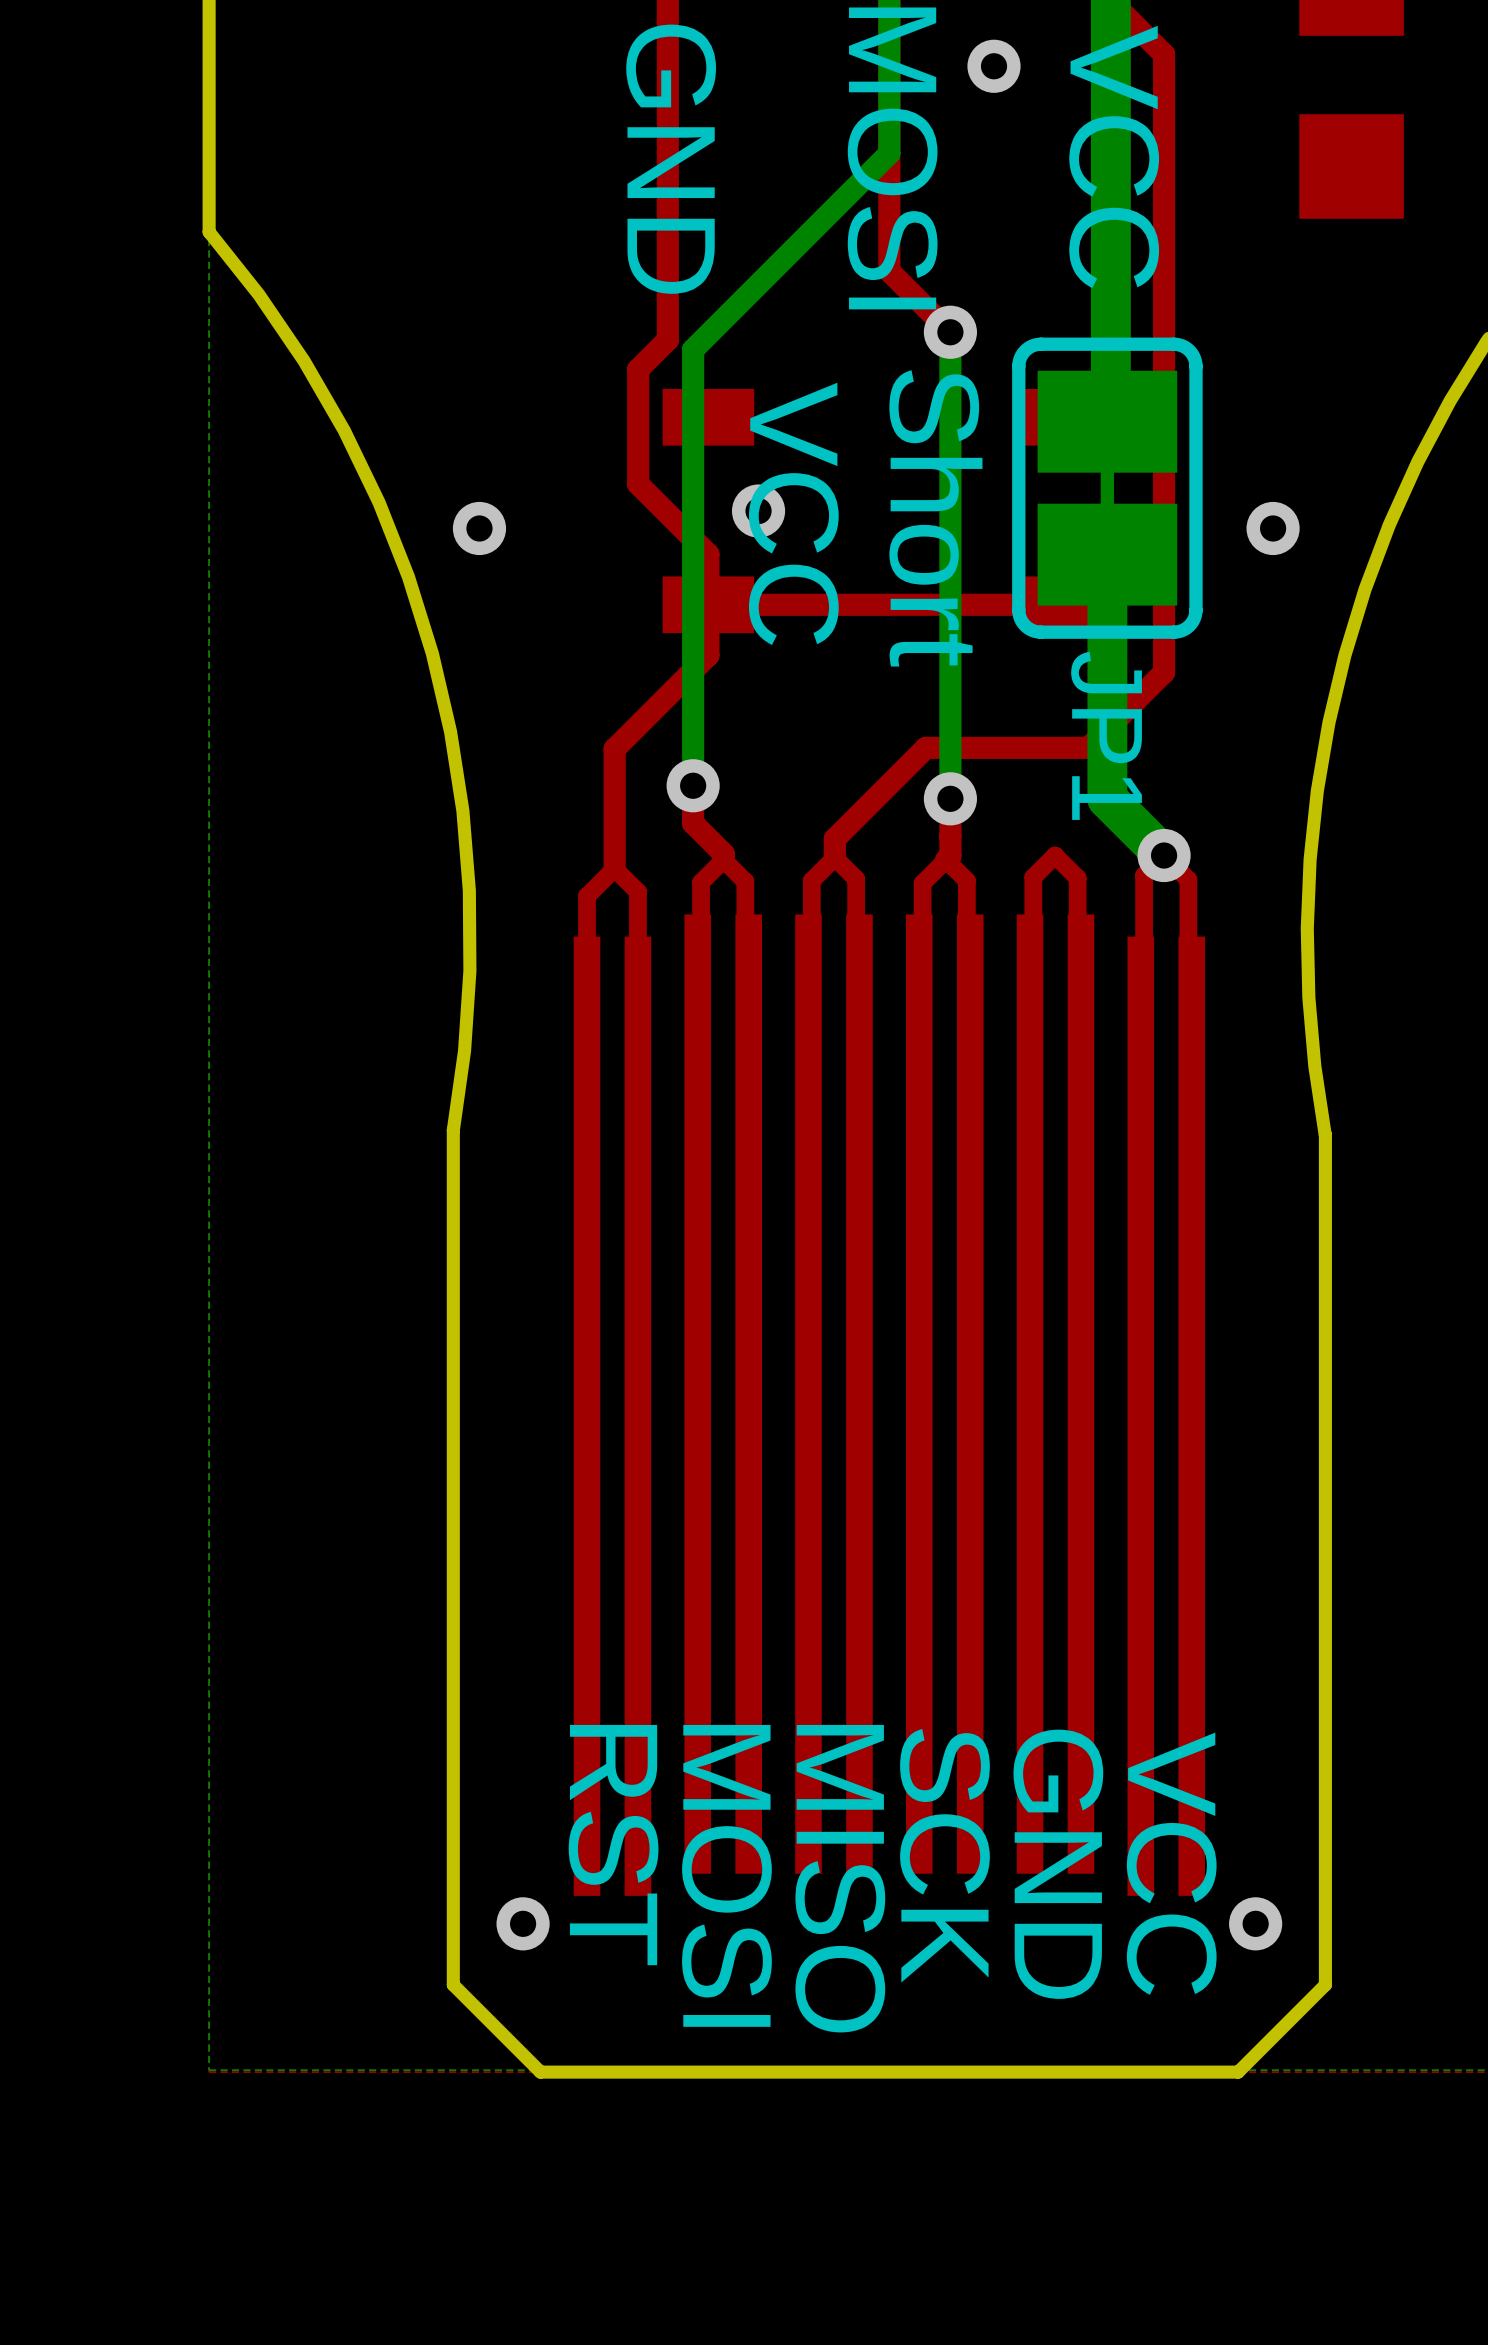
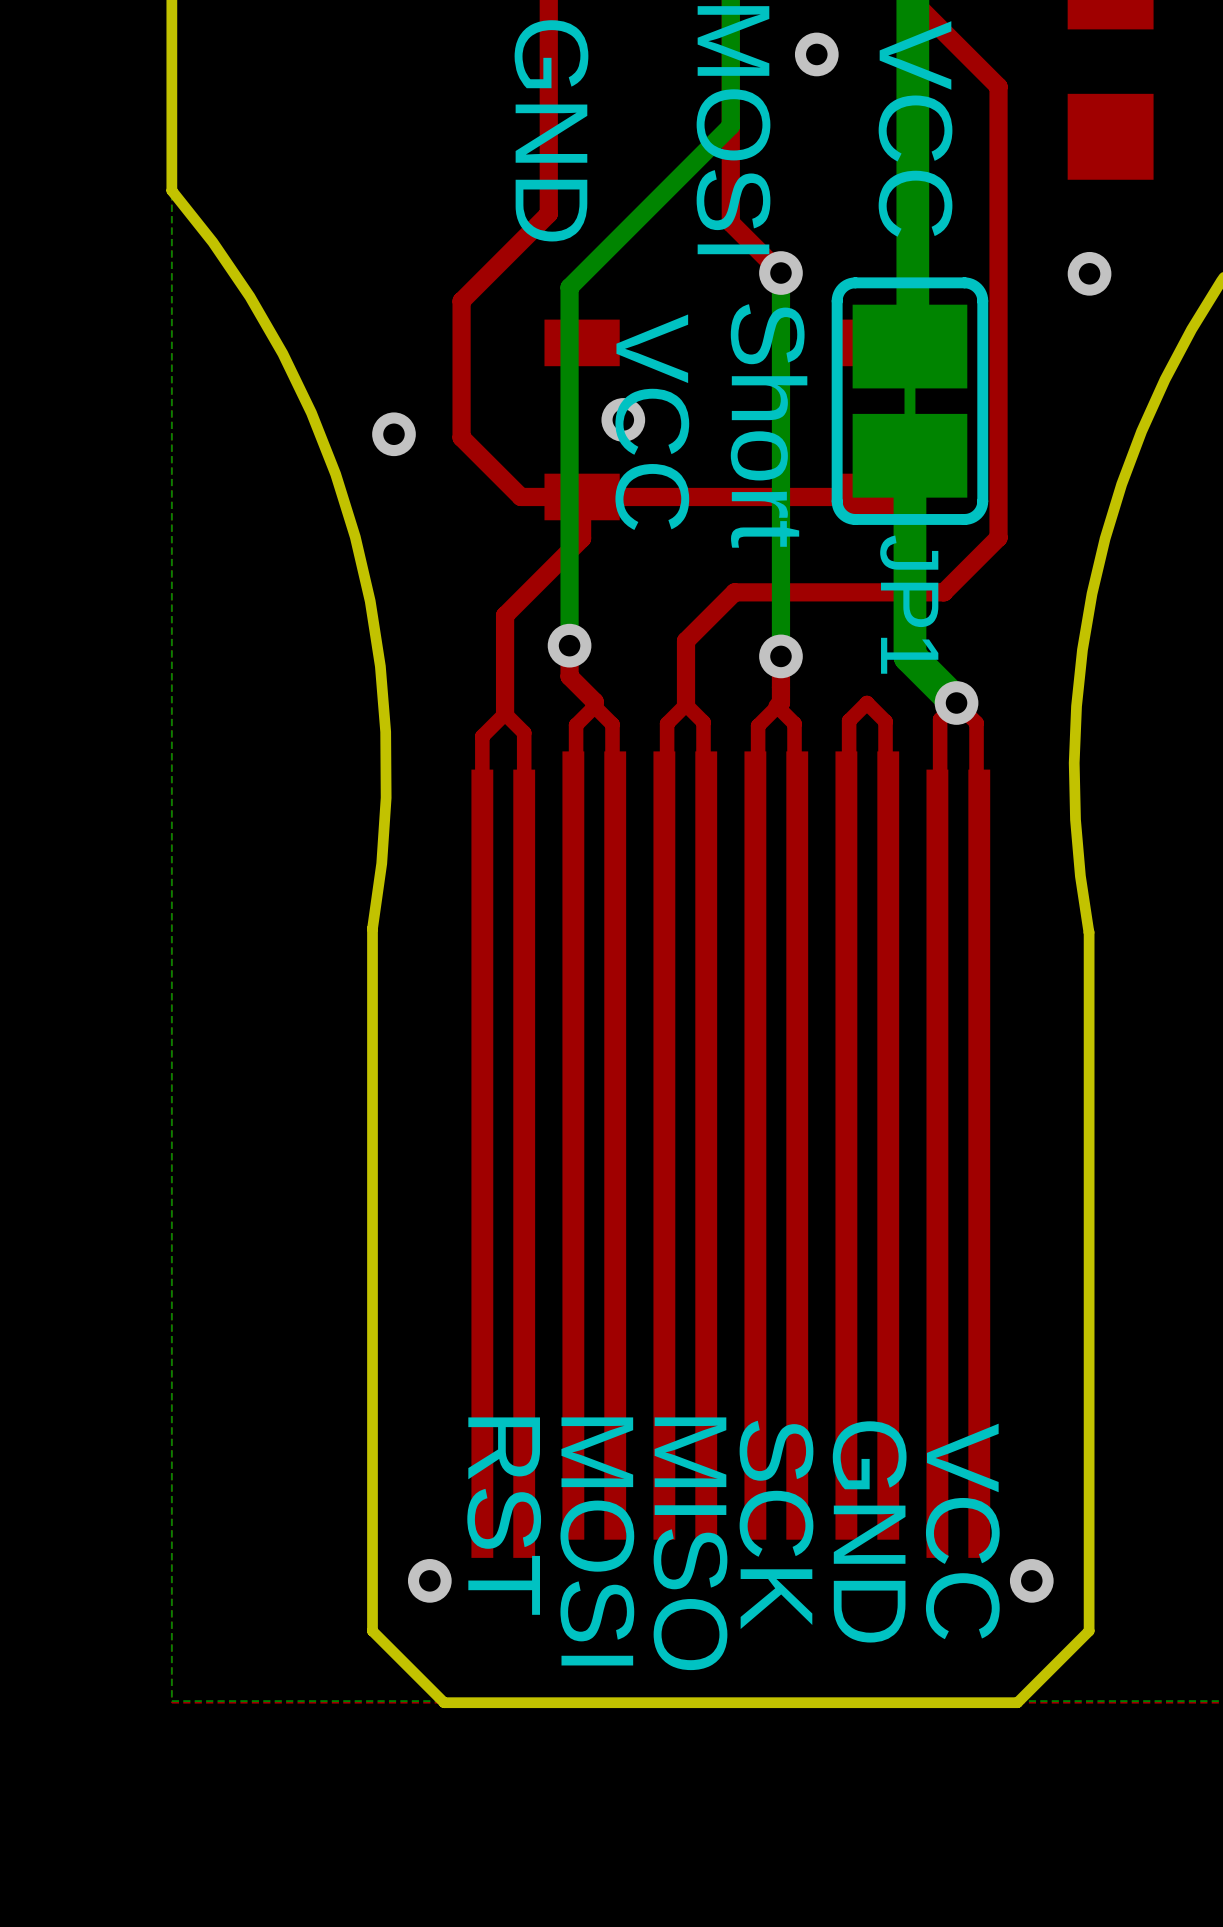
top track: (1164, 54) (1164, 672) (1088, 747) (925, 747) (834, 838) -> (956, 44) (998, 86) (998, 537) (943, 592) (734, 592) (686, 640) (686, 689)
top track: (667, 260) (667, 339) (638, 369) (638, 484) (708, 554) (708, 604) -> (548, 213) (461, 301) (461, 437) (520, 496) (582, 496)
via position: (1273, 528) -> (1089, 273)

